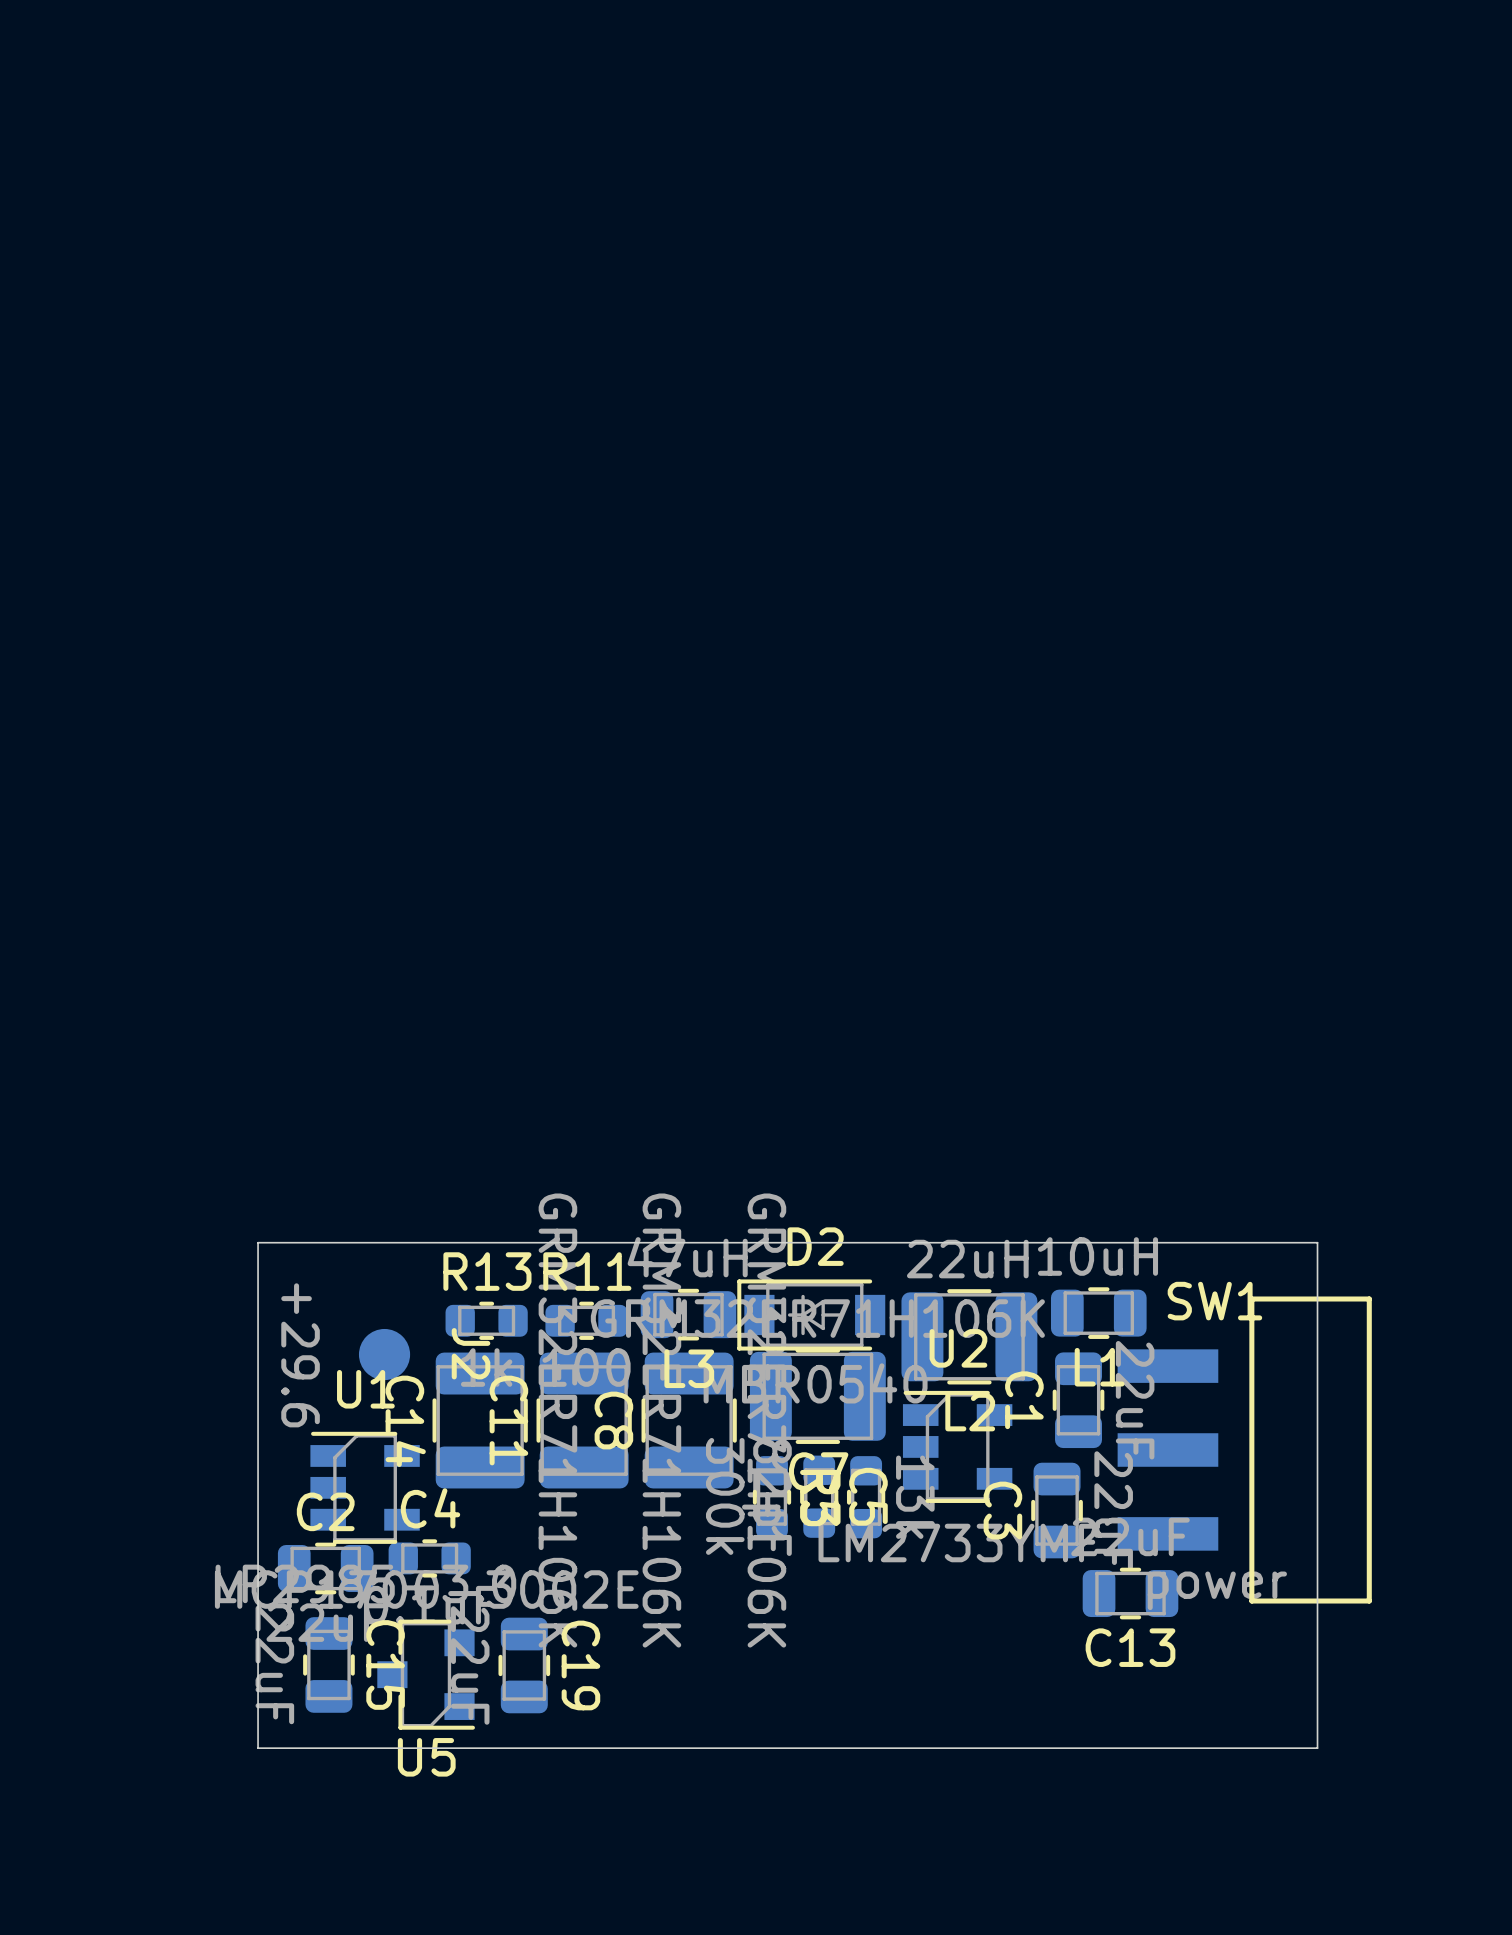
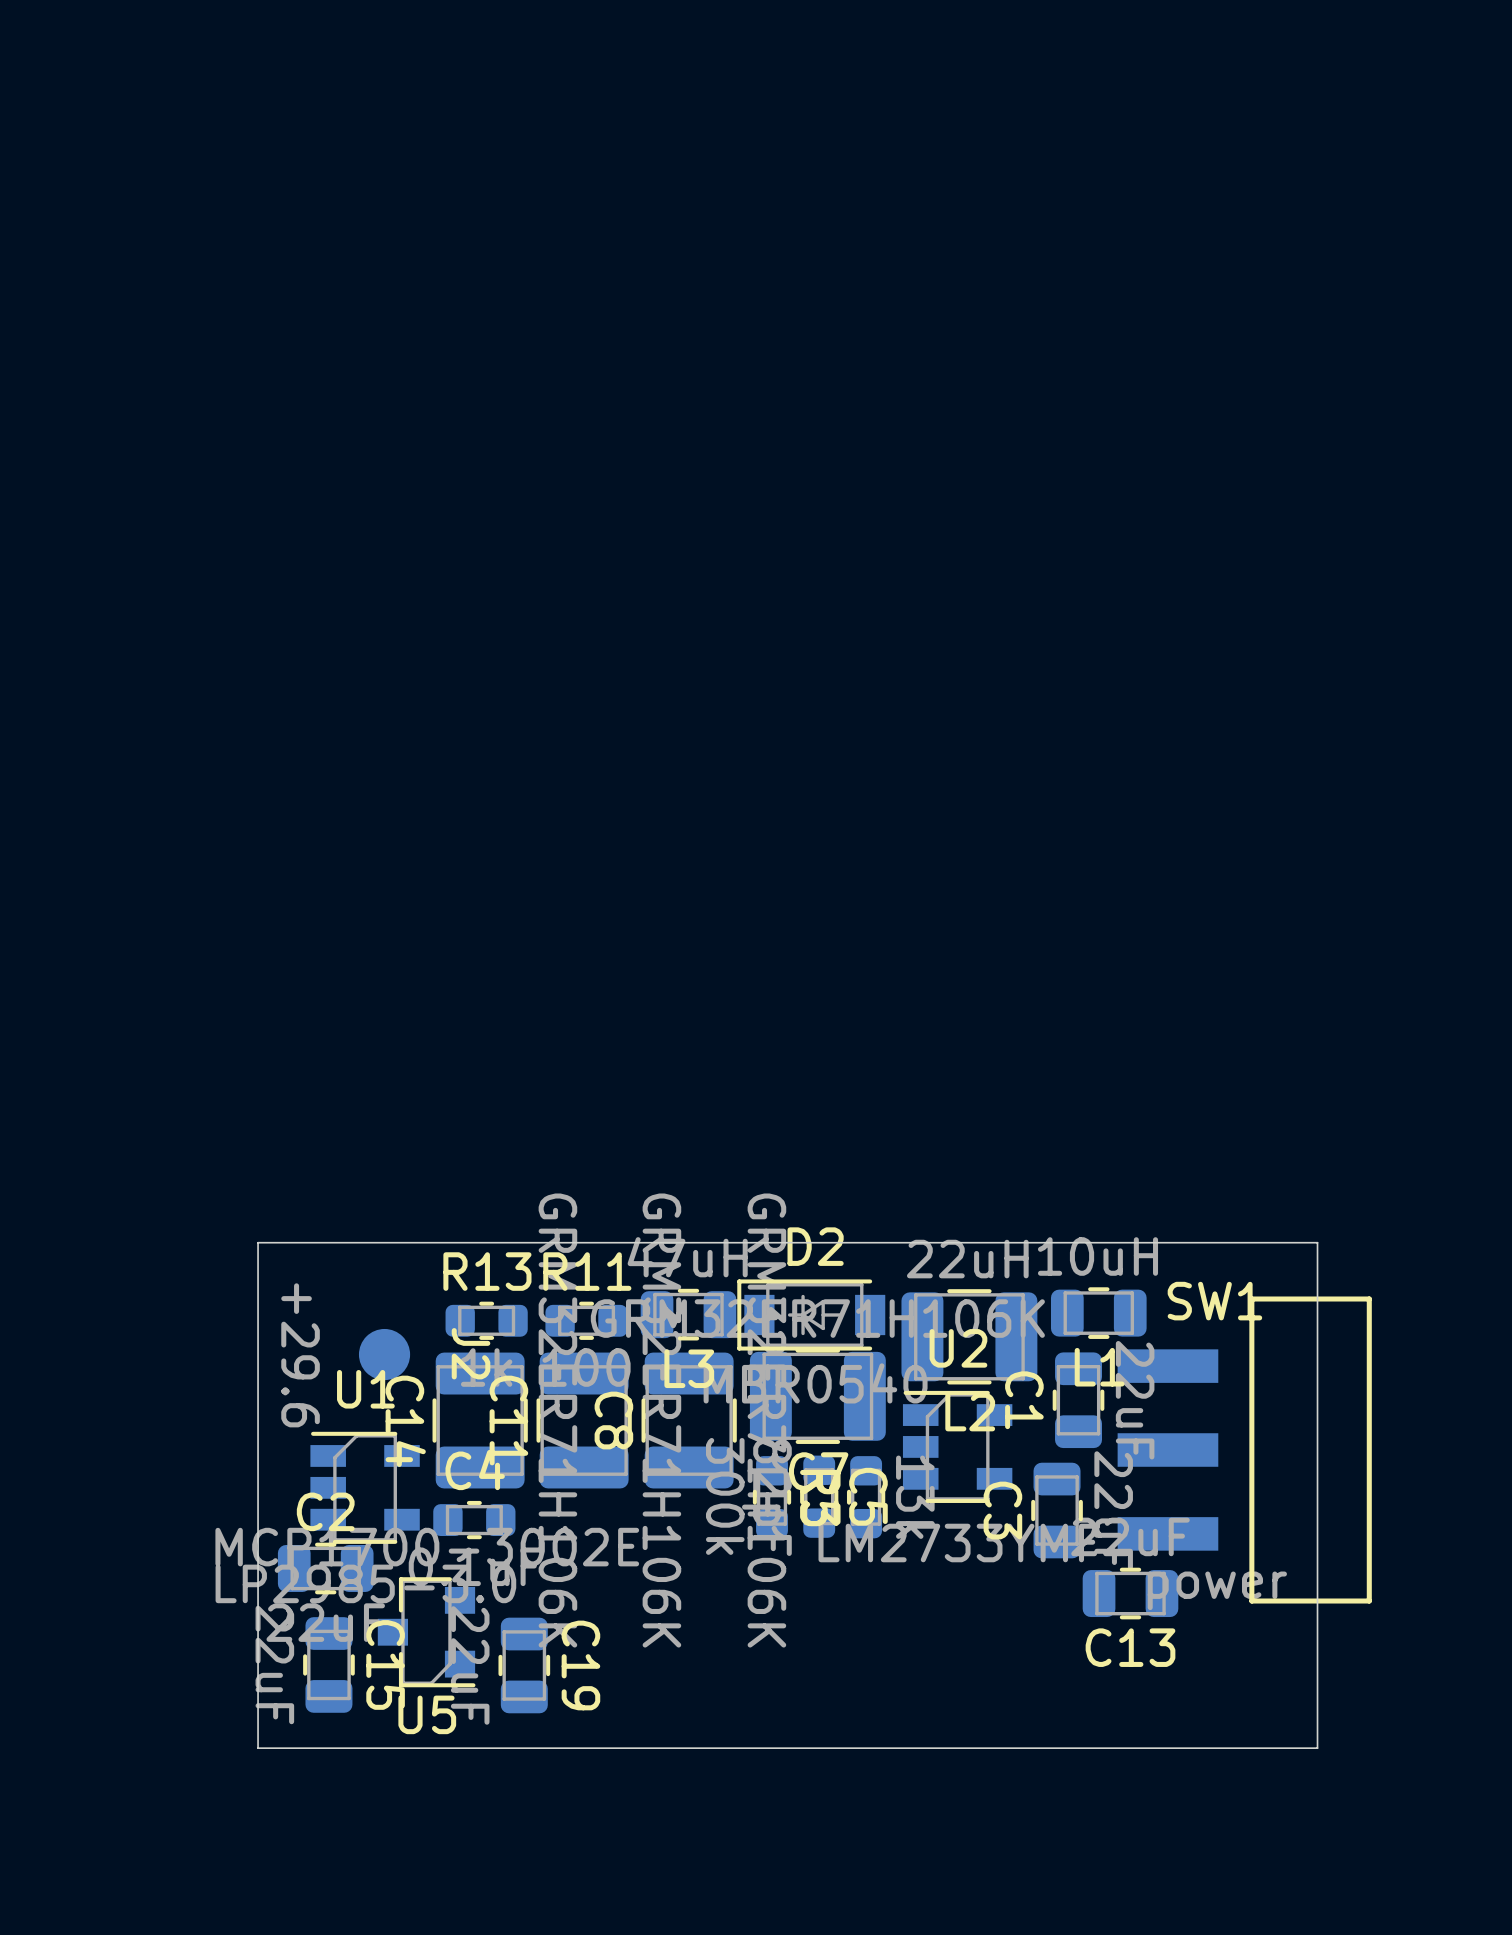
C4 position: (429, 1558) -> (474, 1520)
U5 position: (426, 1674) -> (426, 1632)

